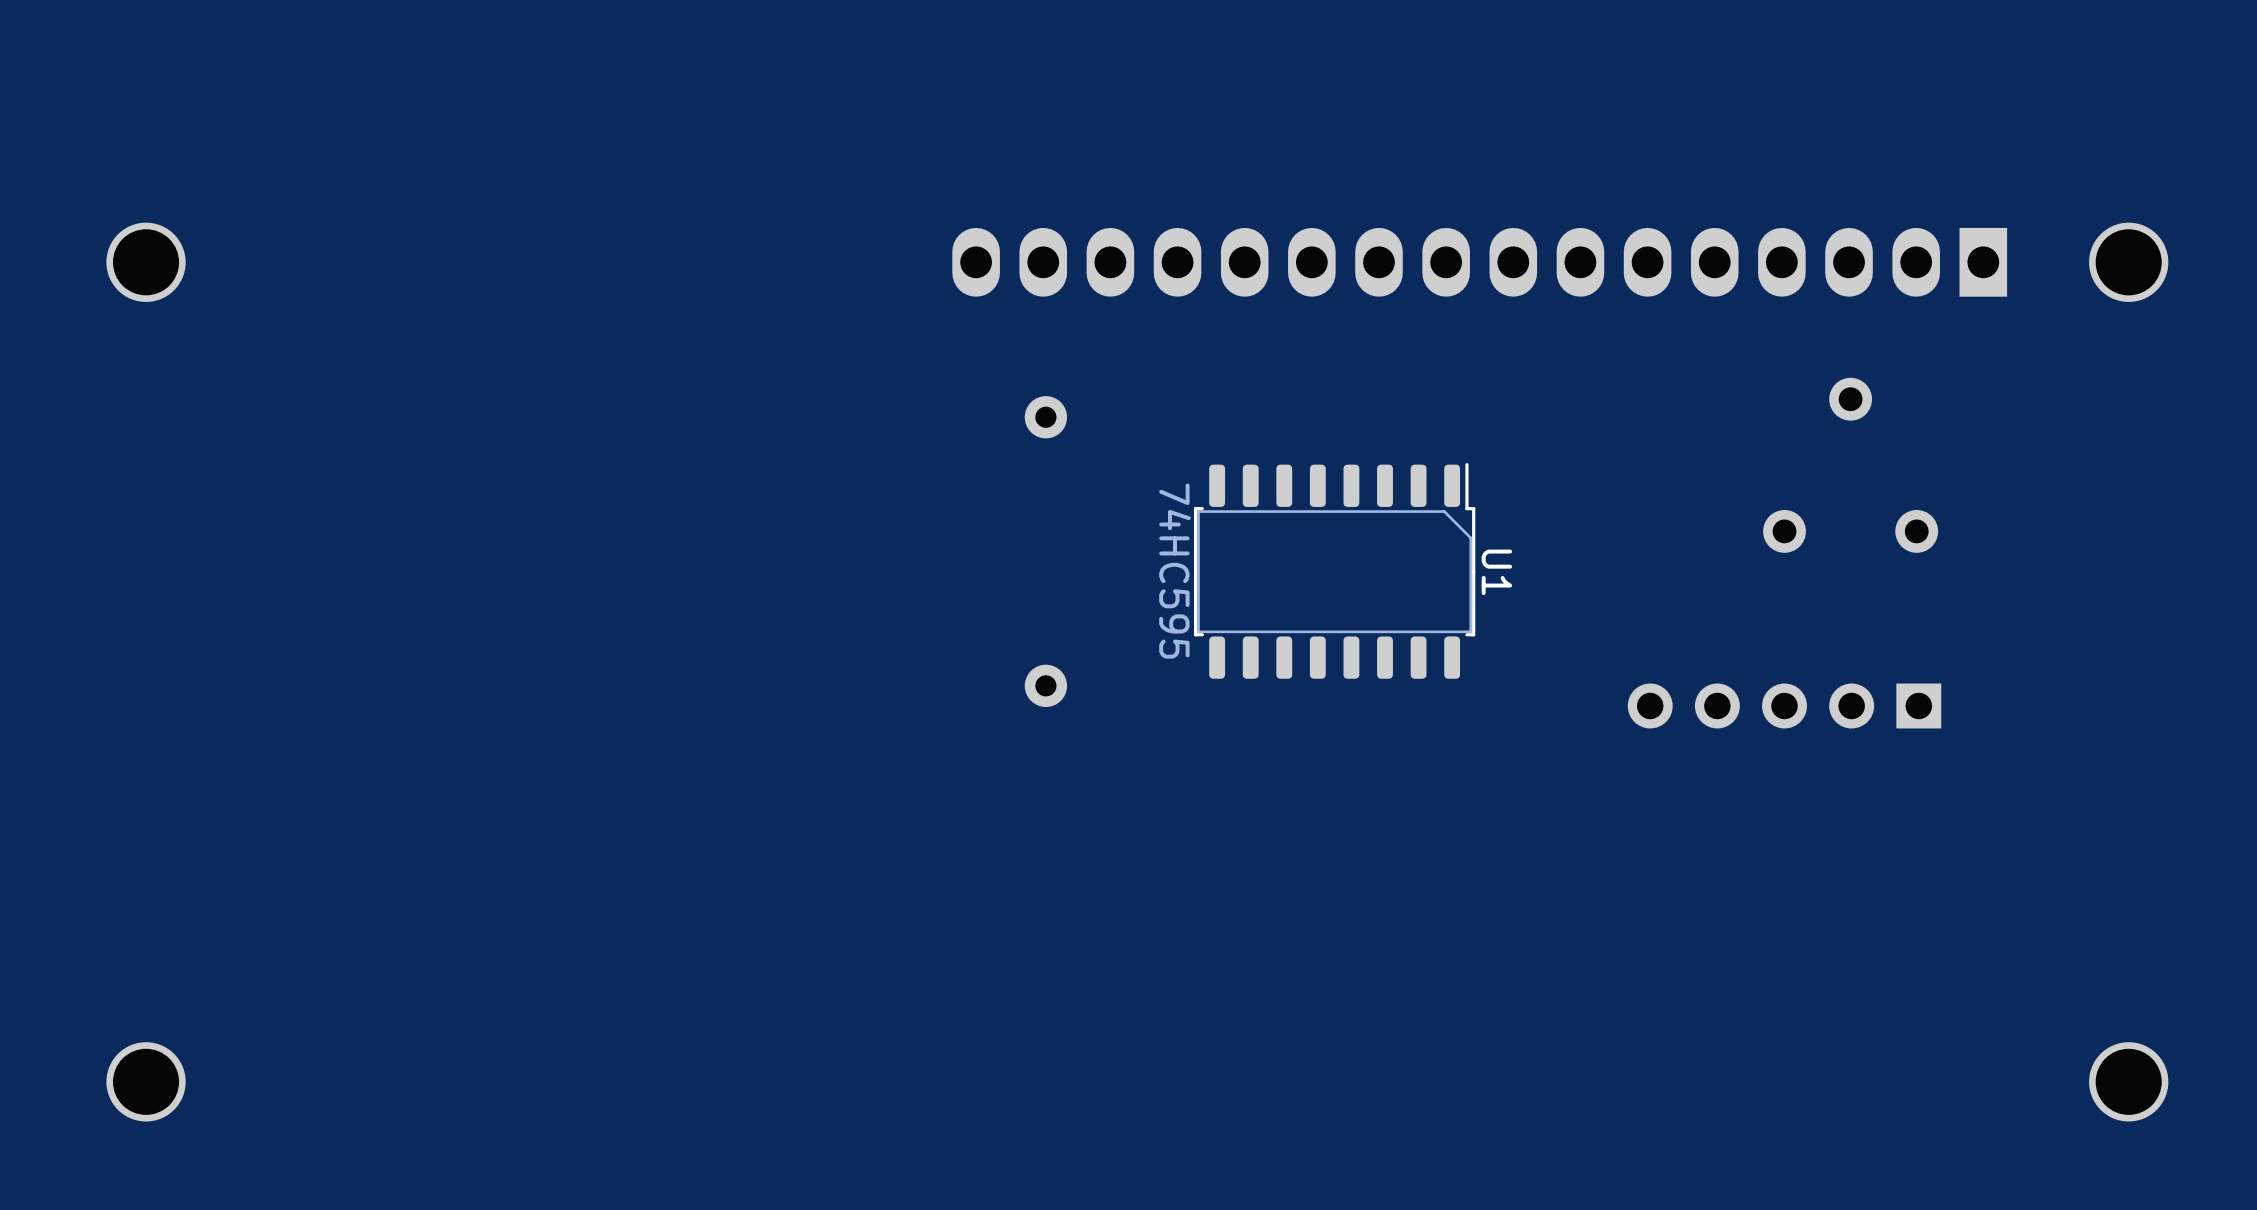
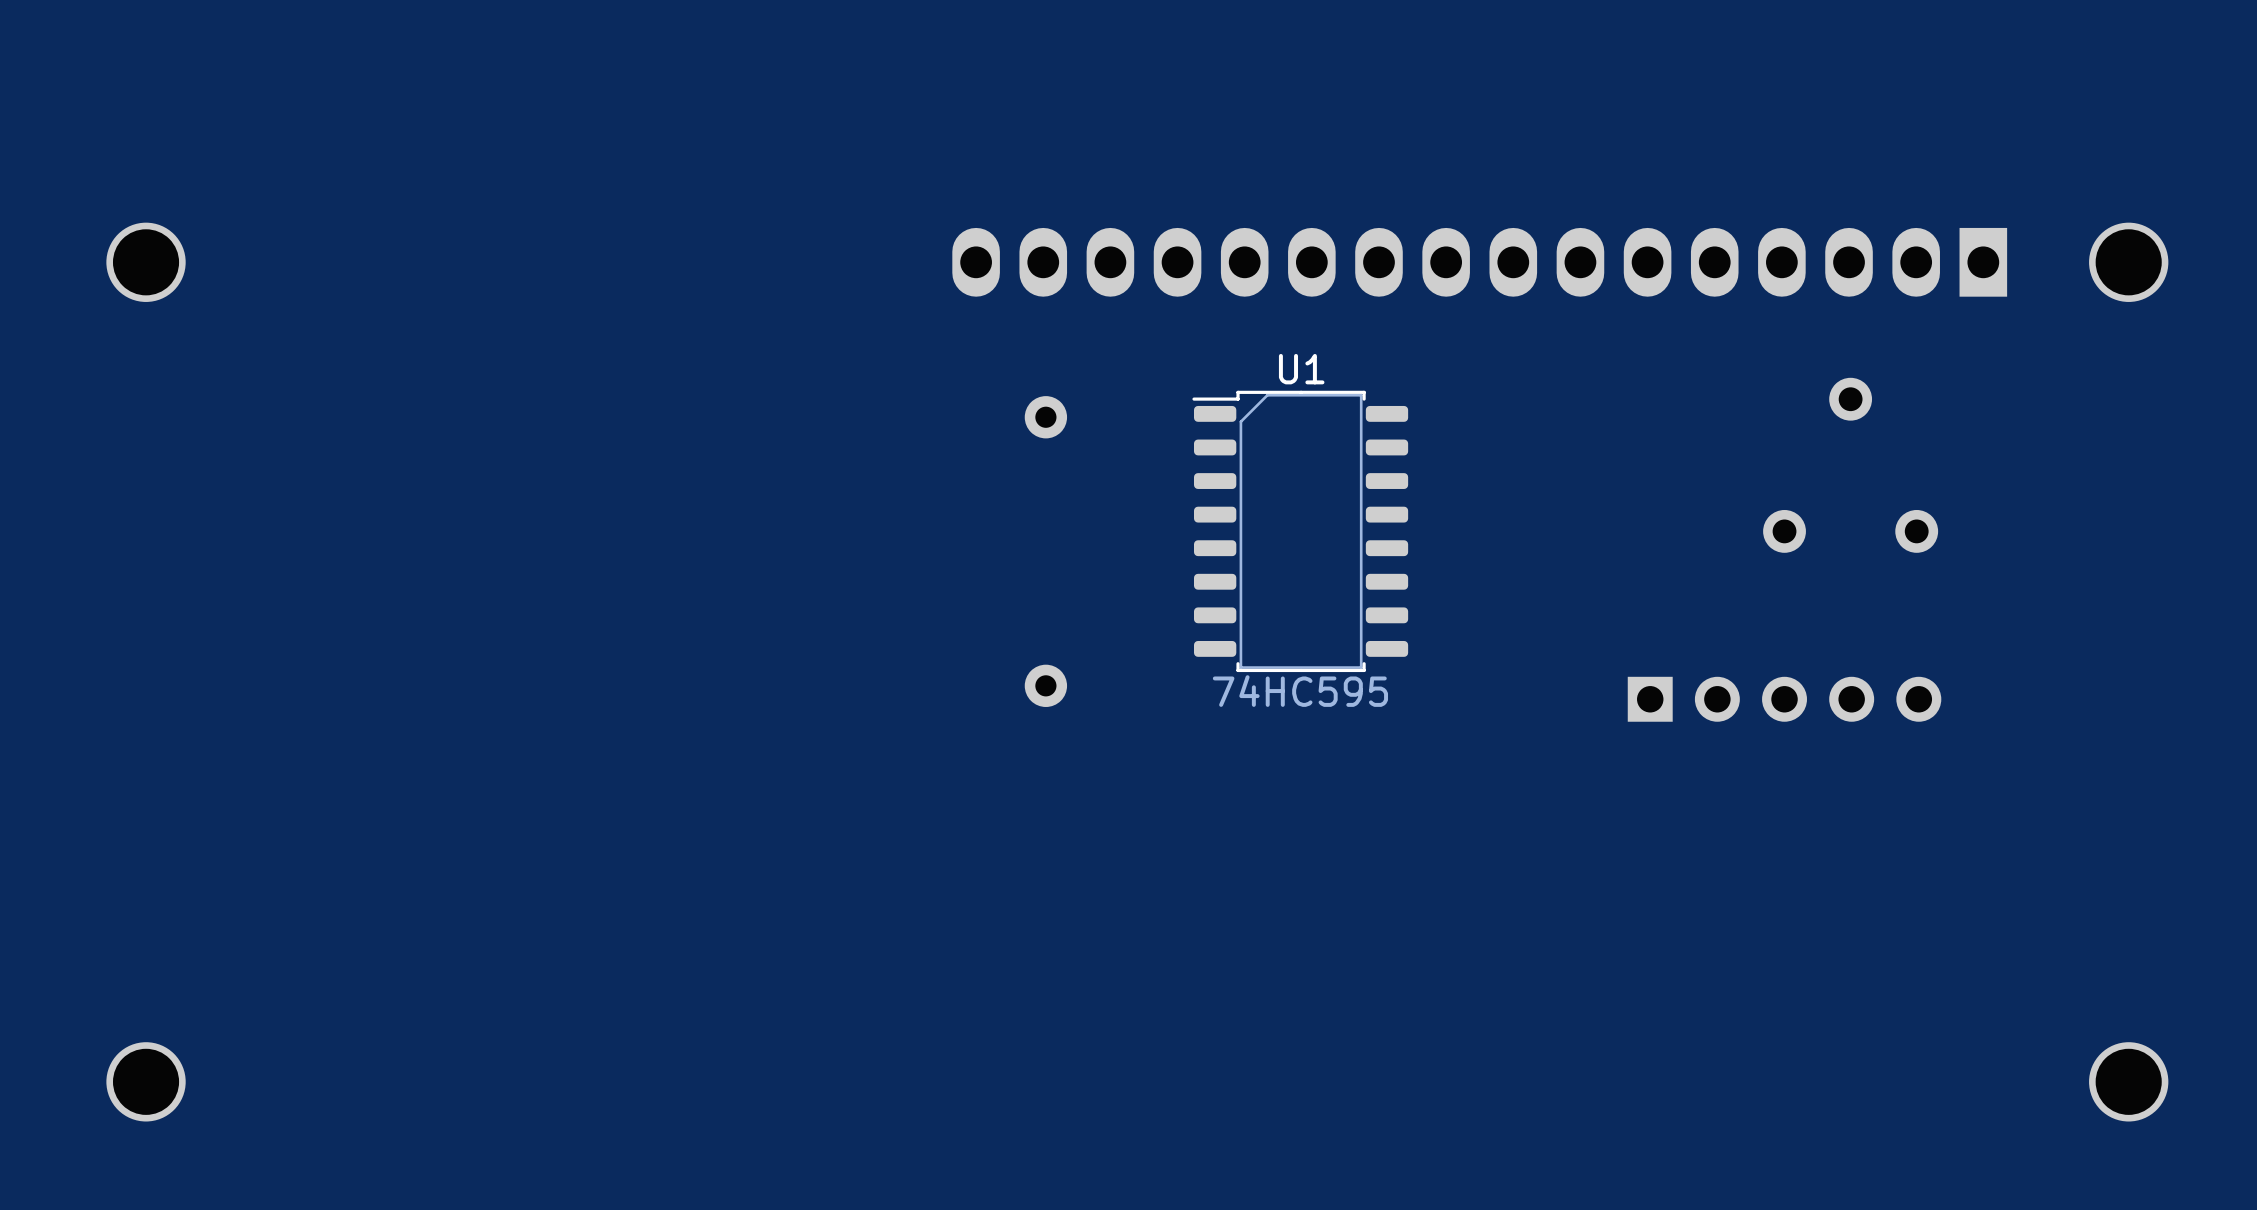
U1 rotation: 0° (1334, 570) -> 90° counterclockwise (1300, 531)
part rotation: 0° (1784, 705) -> 180° (1784, 699)

